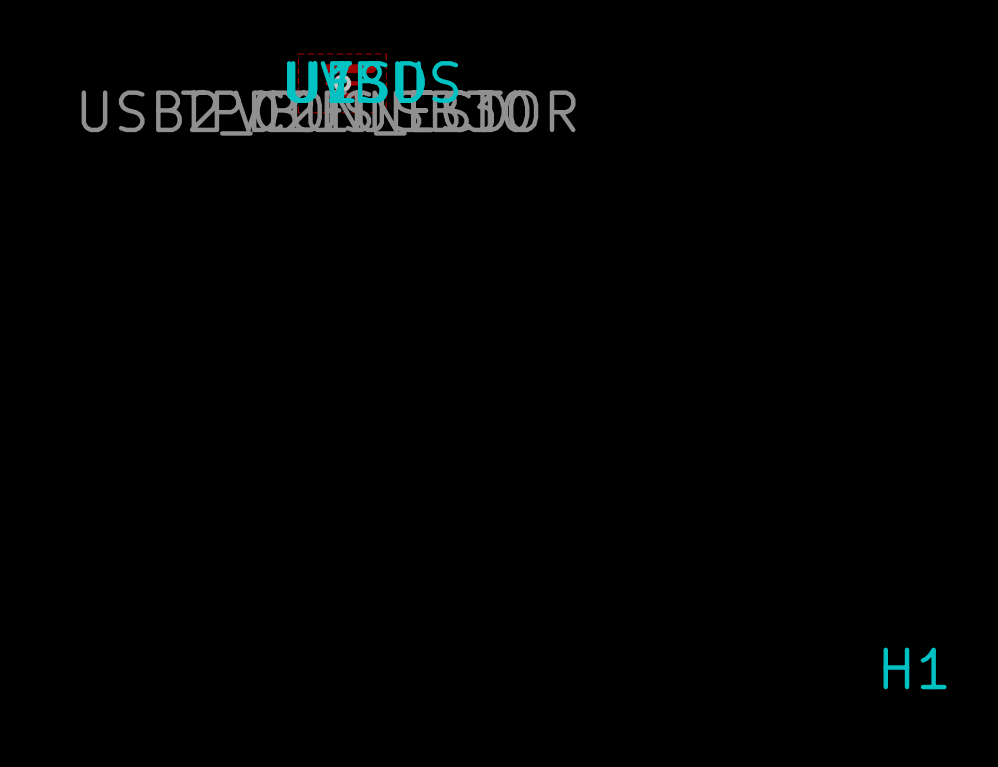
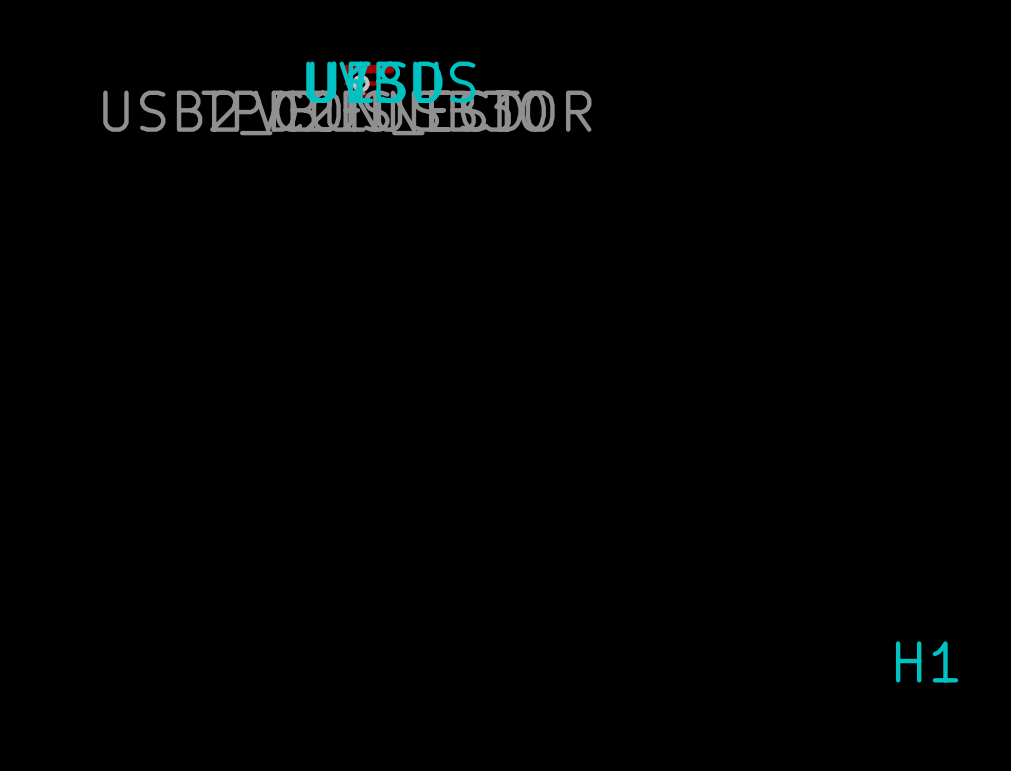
top zone outline: (298, 54) (386, 54) (386, 112) (298, 112) (298, 54) -> none

